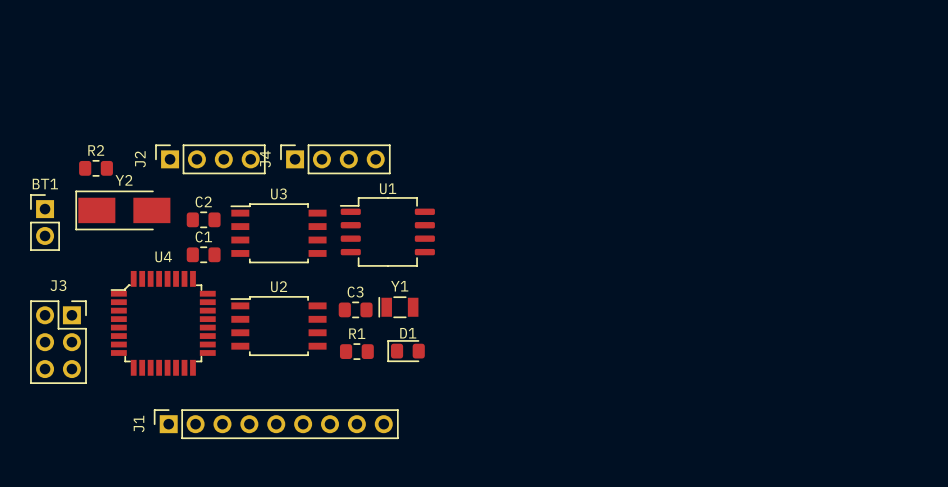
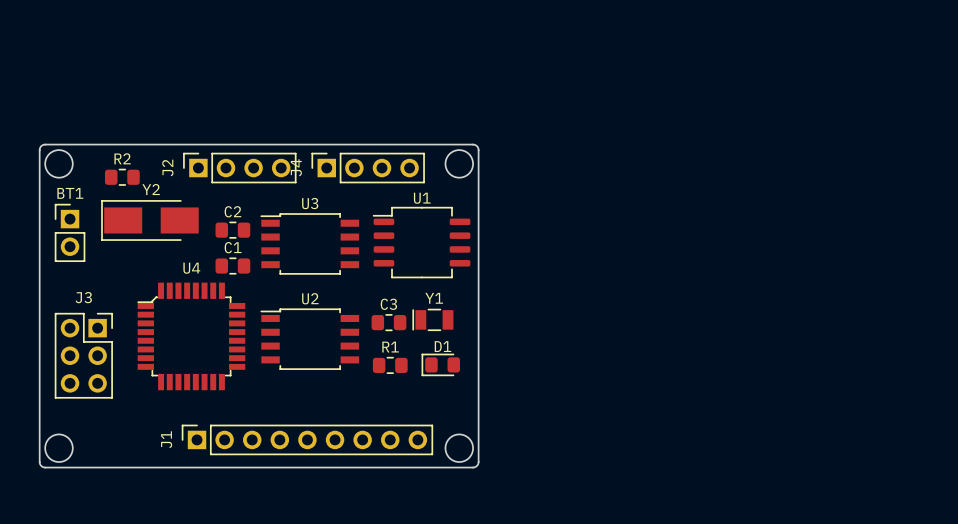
board edge: none -> (45, 144) (476, 145) (478, 150) (477, 465) (473, 467) (41, 466) (39, 462) (39, 150) (41, 146) (45, 144)
round board edge: none -> [44, 149, 74, 178]
round board edge: none -> [445, 149, 474, 178]
round board edge: none -> [44, 434, 74, 463]
round board edge: none -> [445, 434, 474, 463]

